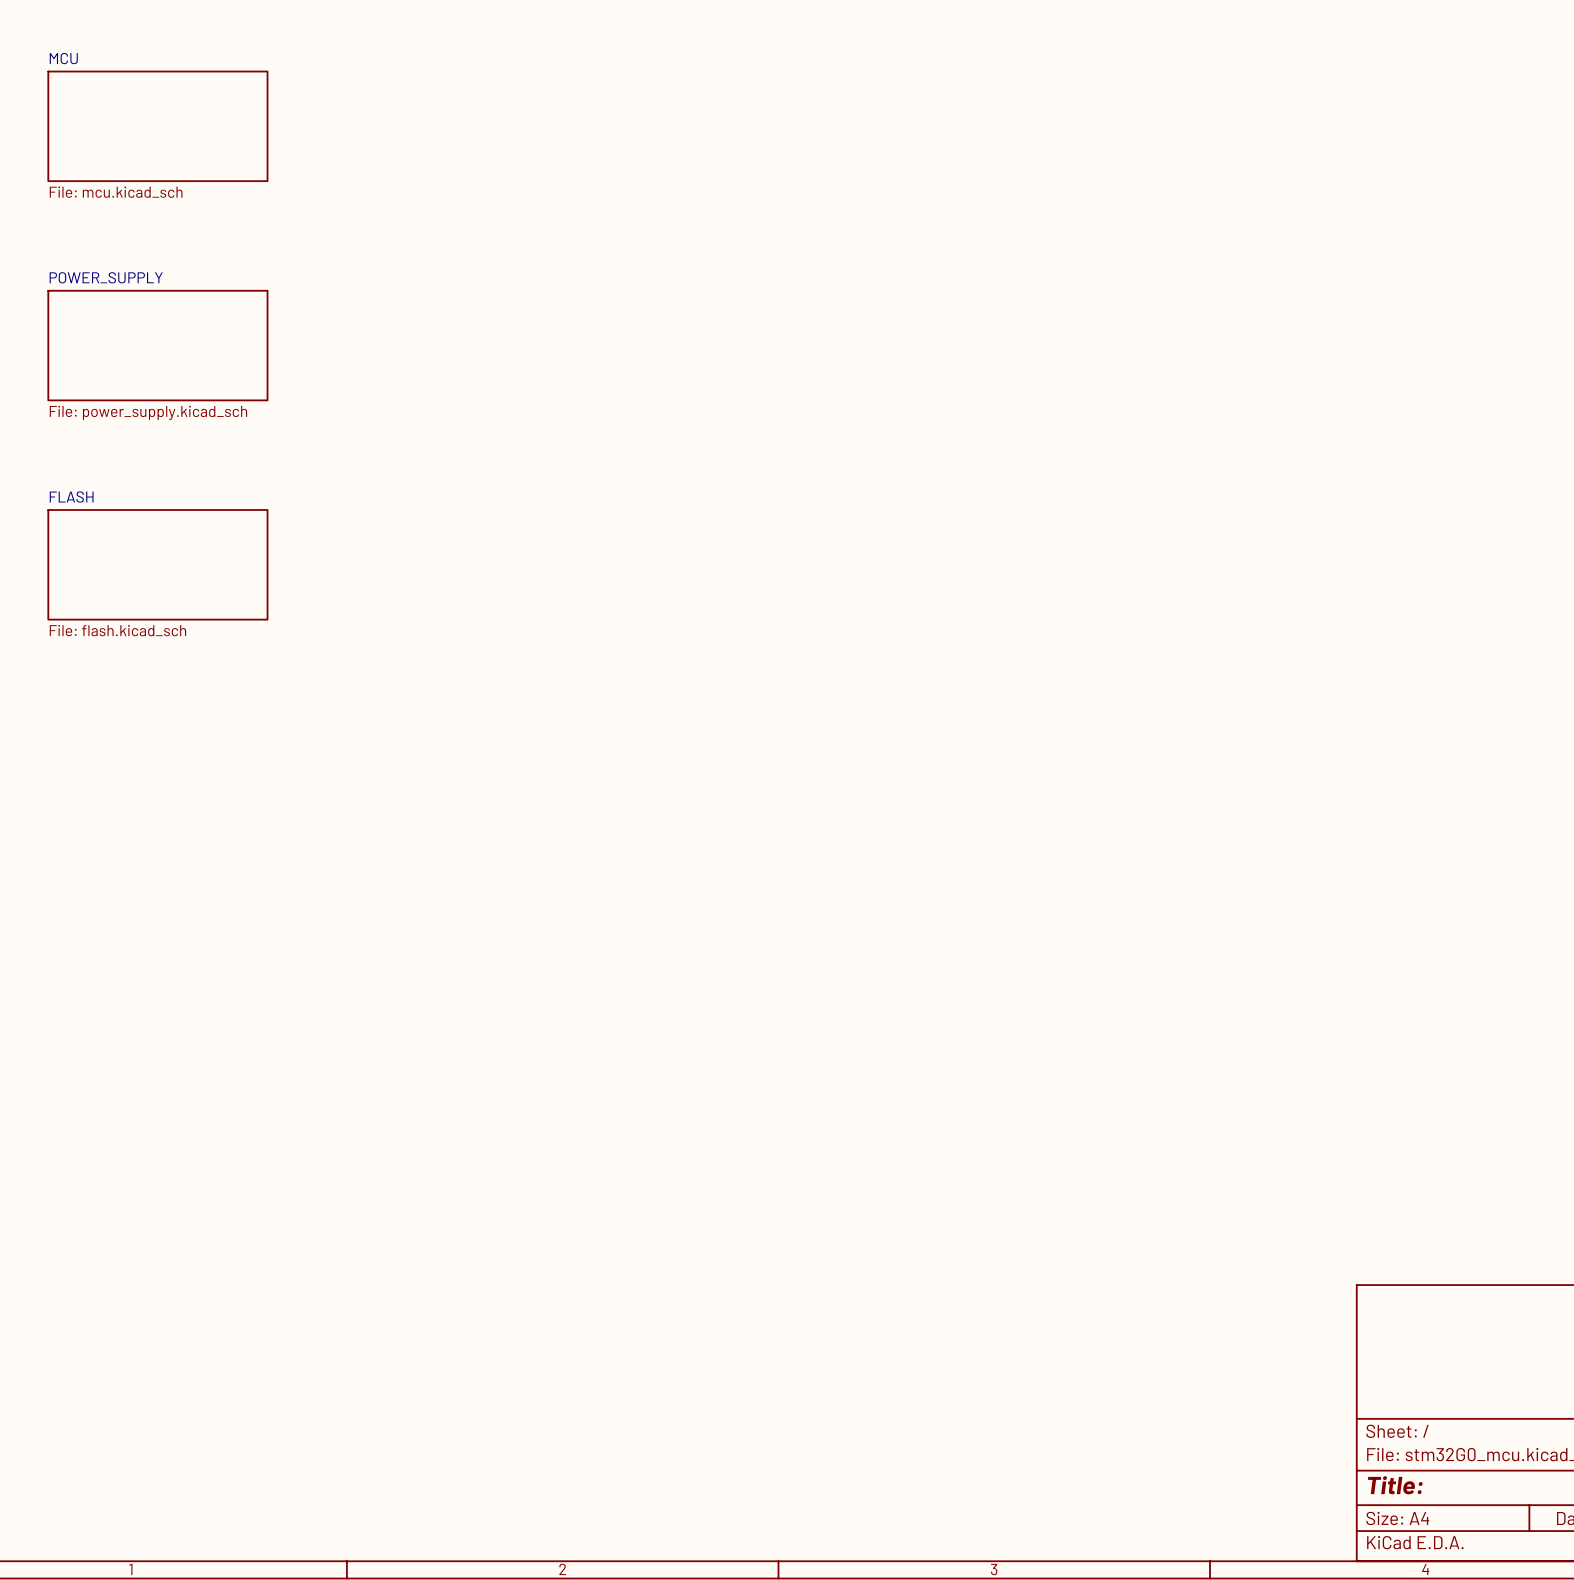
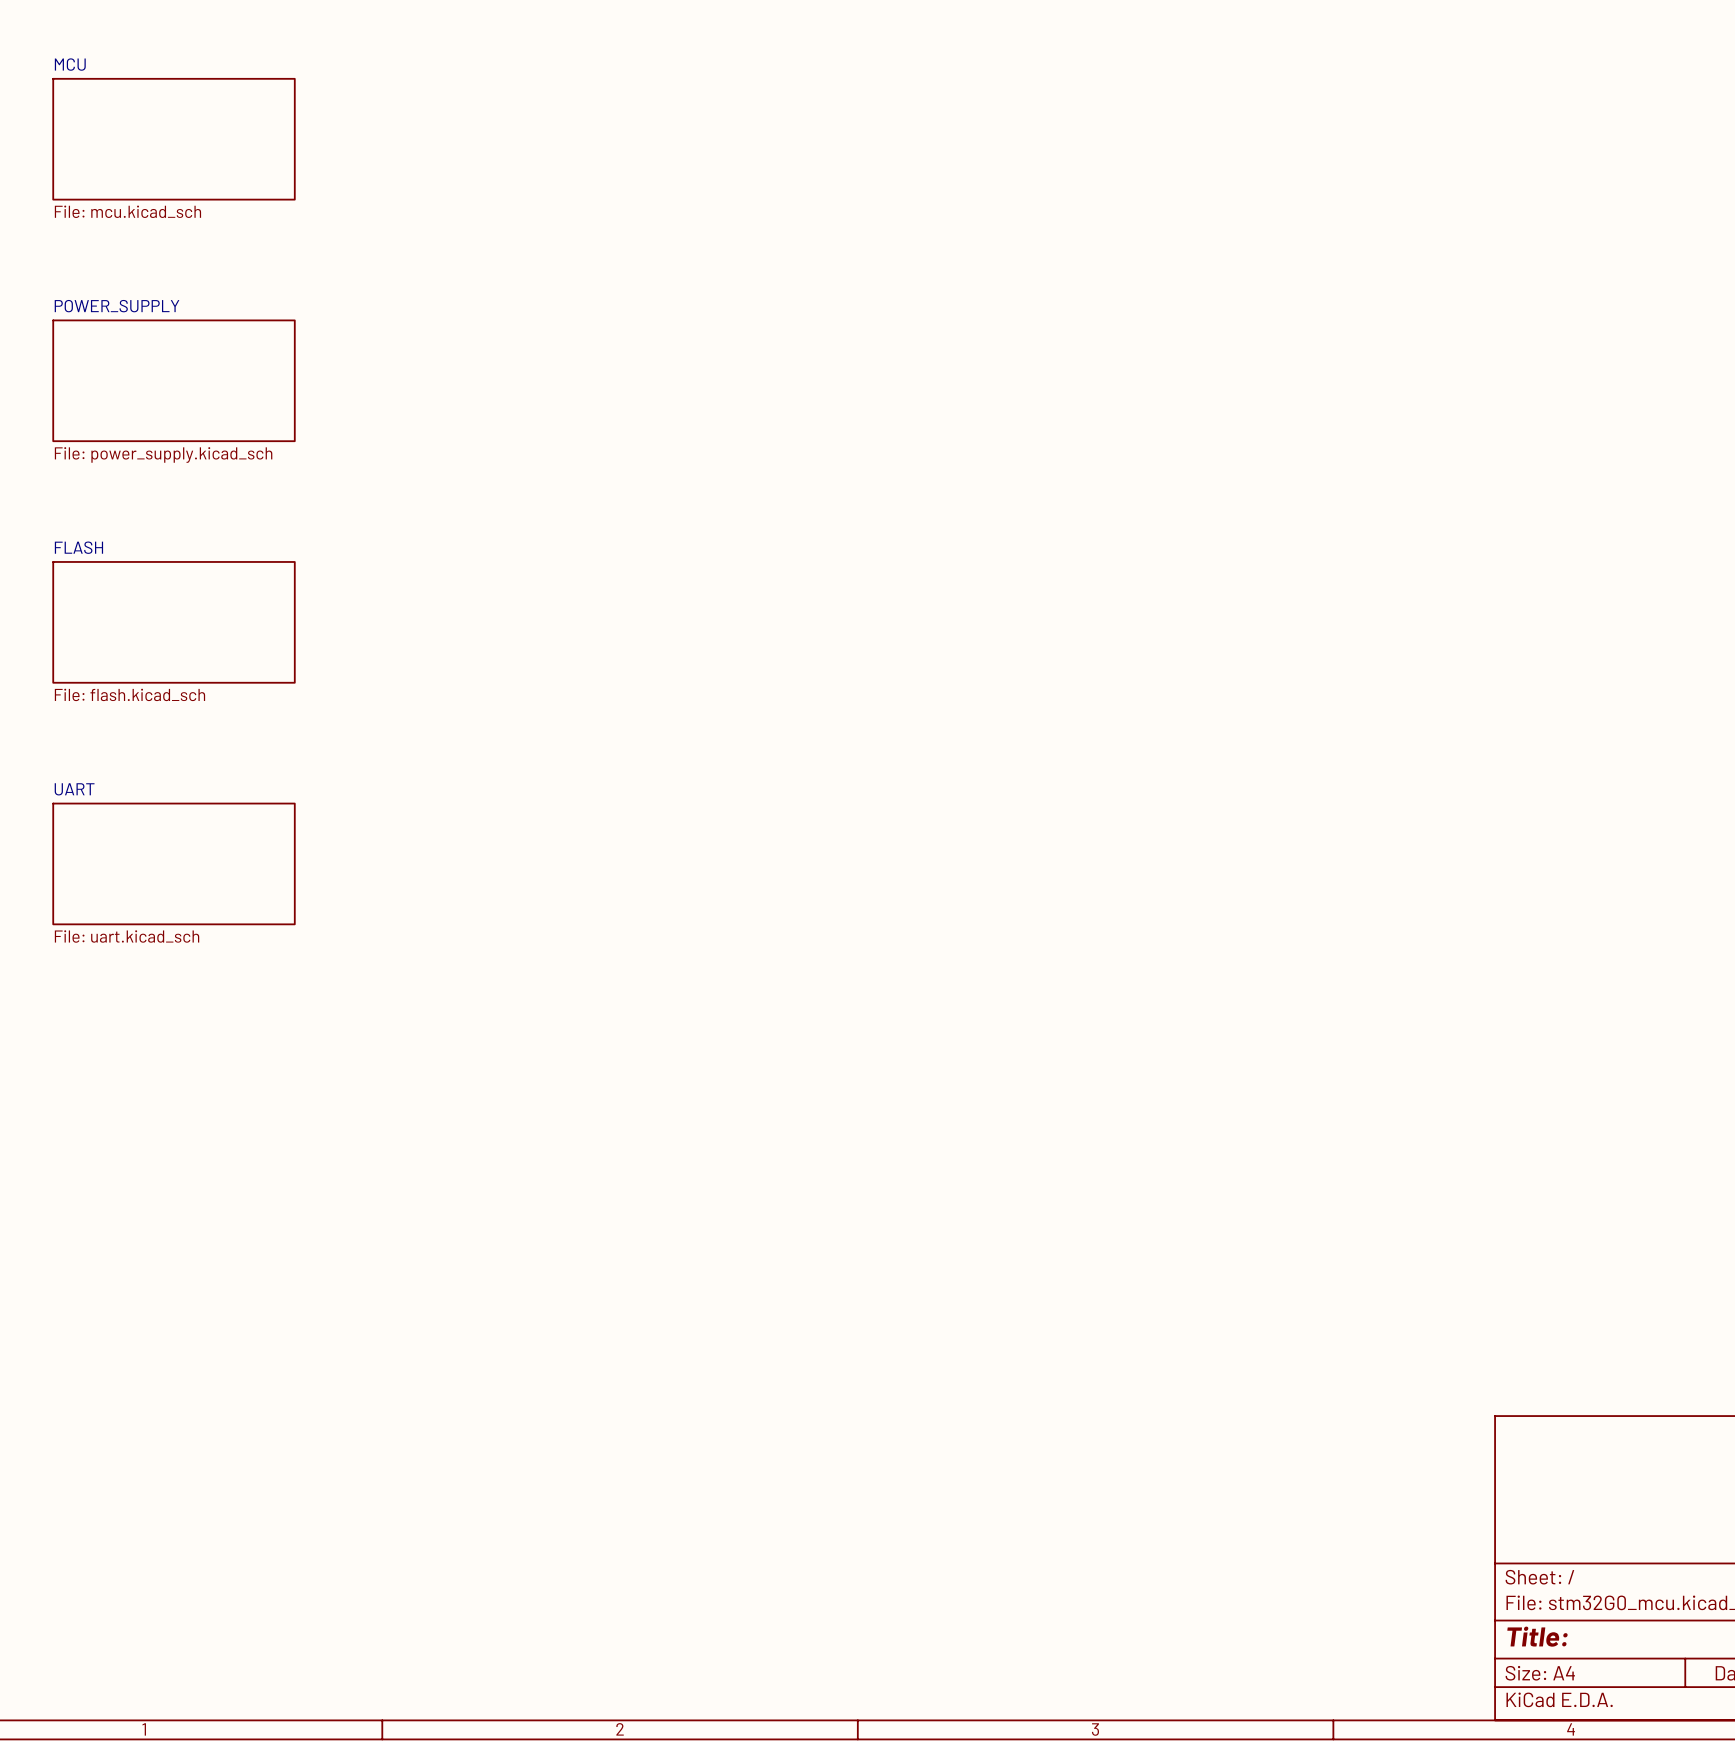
sheet UART: none -> File: uart.kicad_sch (174, 863)

